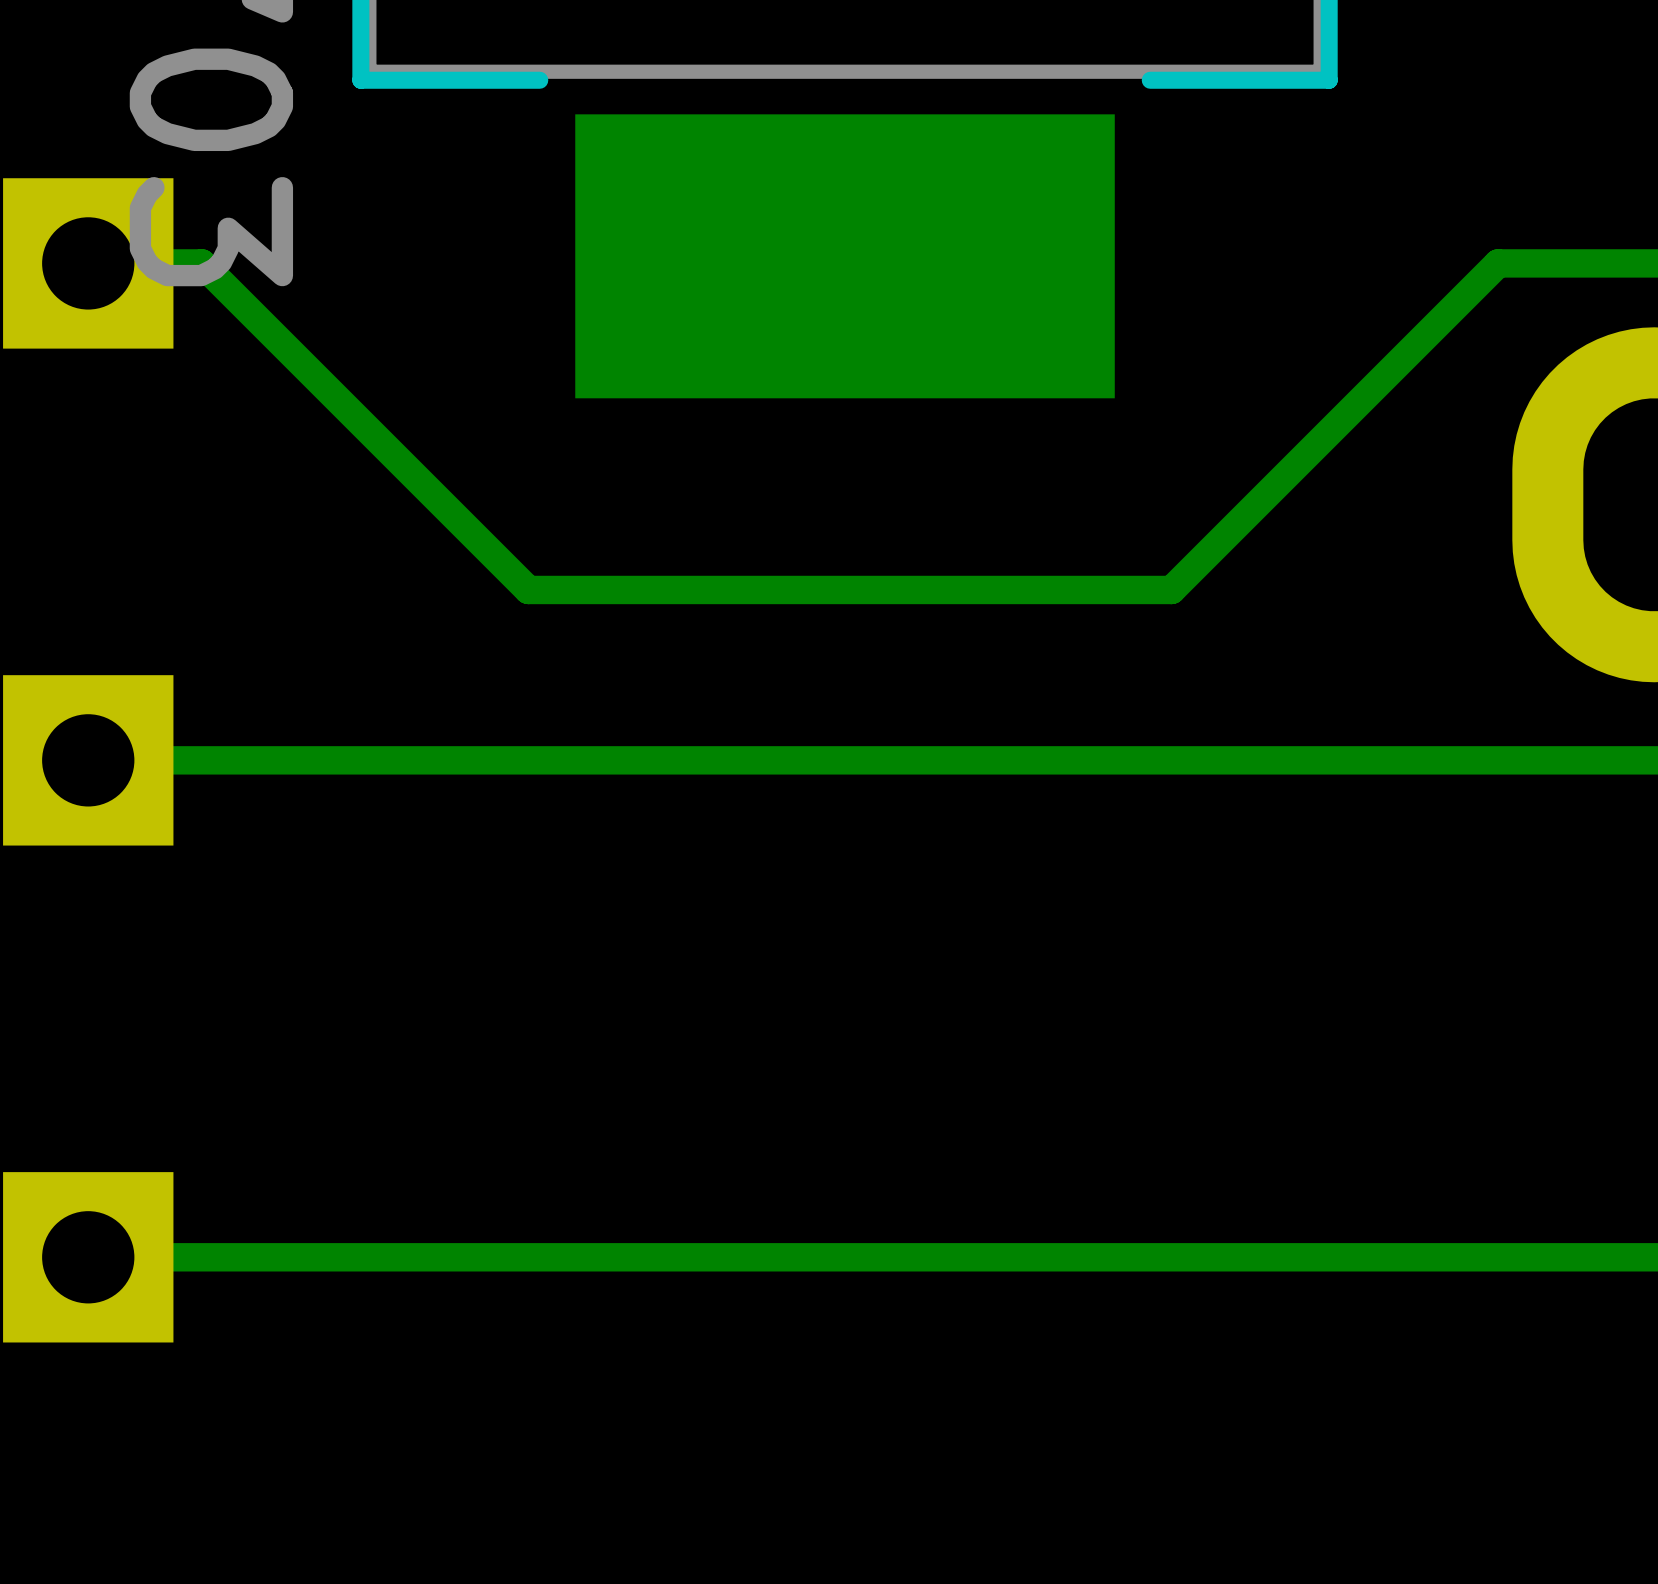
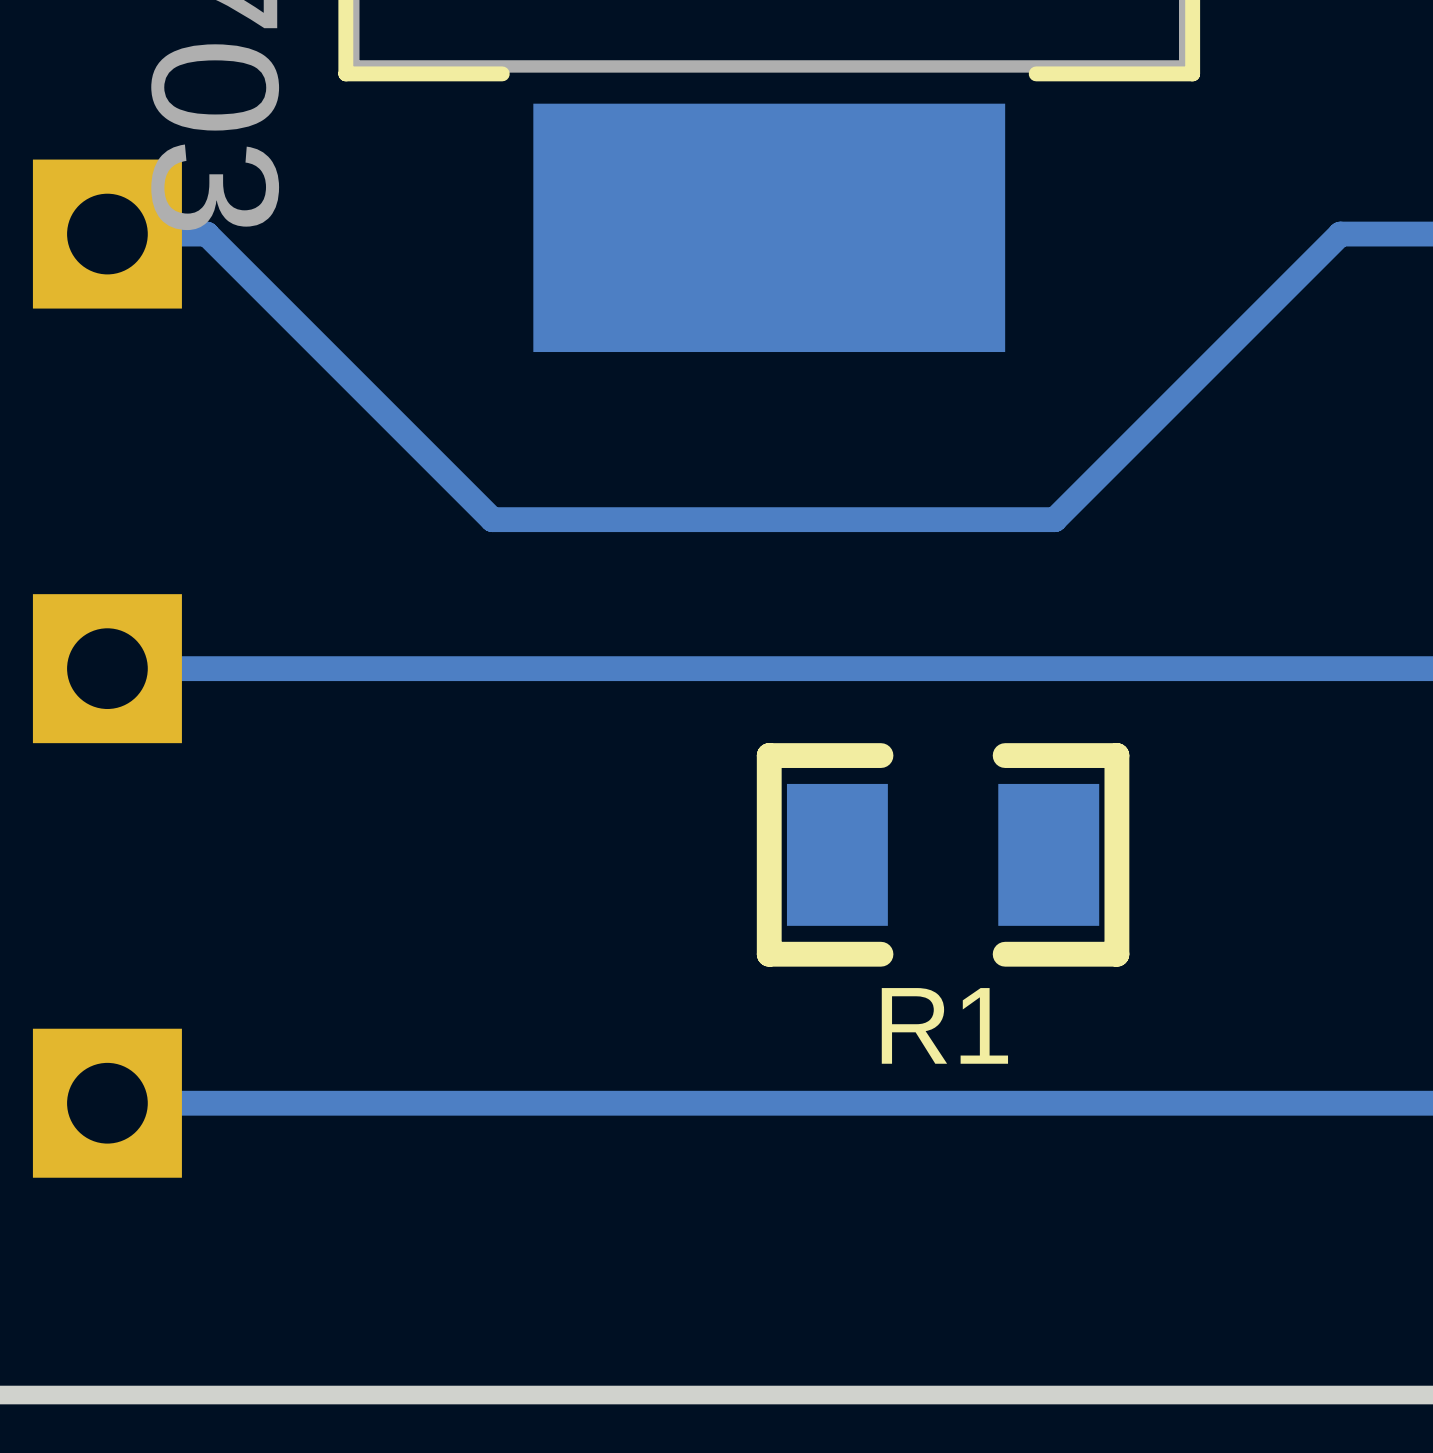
R1: none -> (943, 854)

